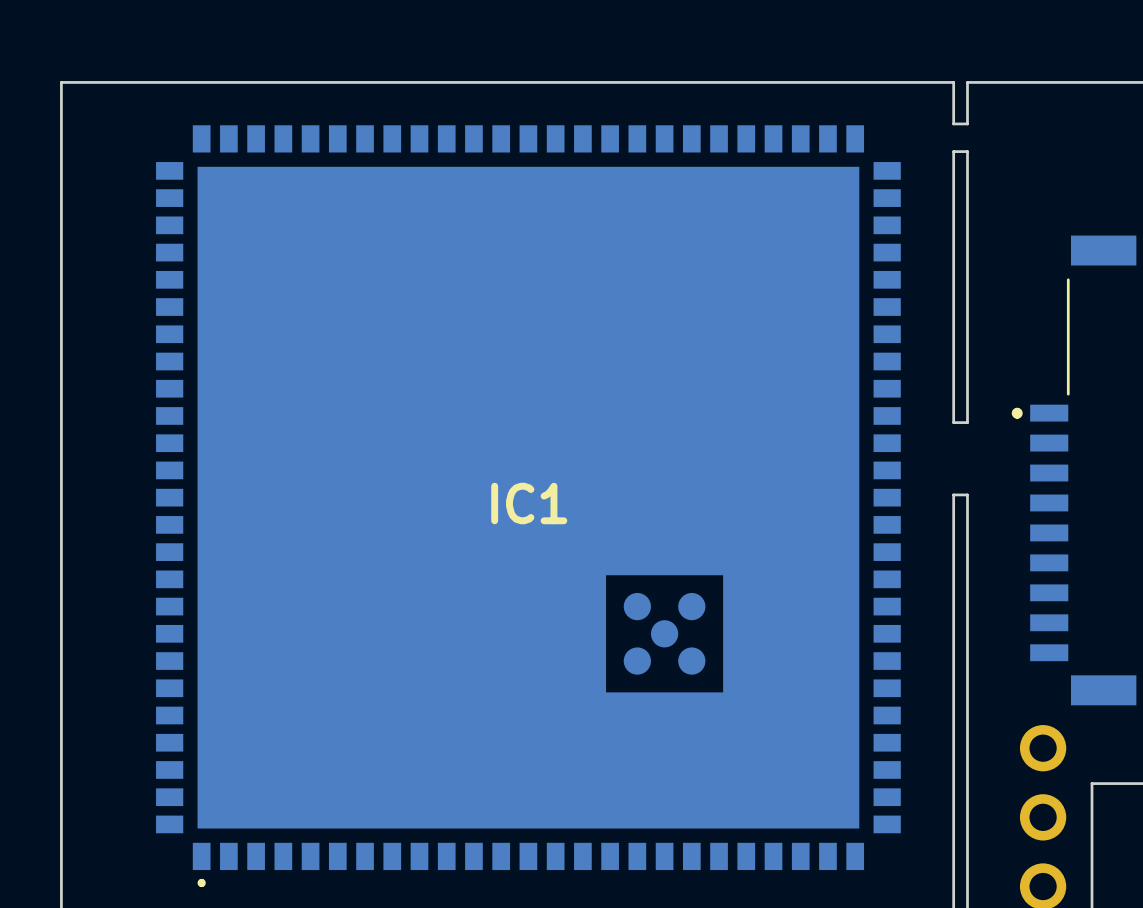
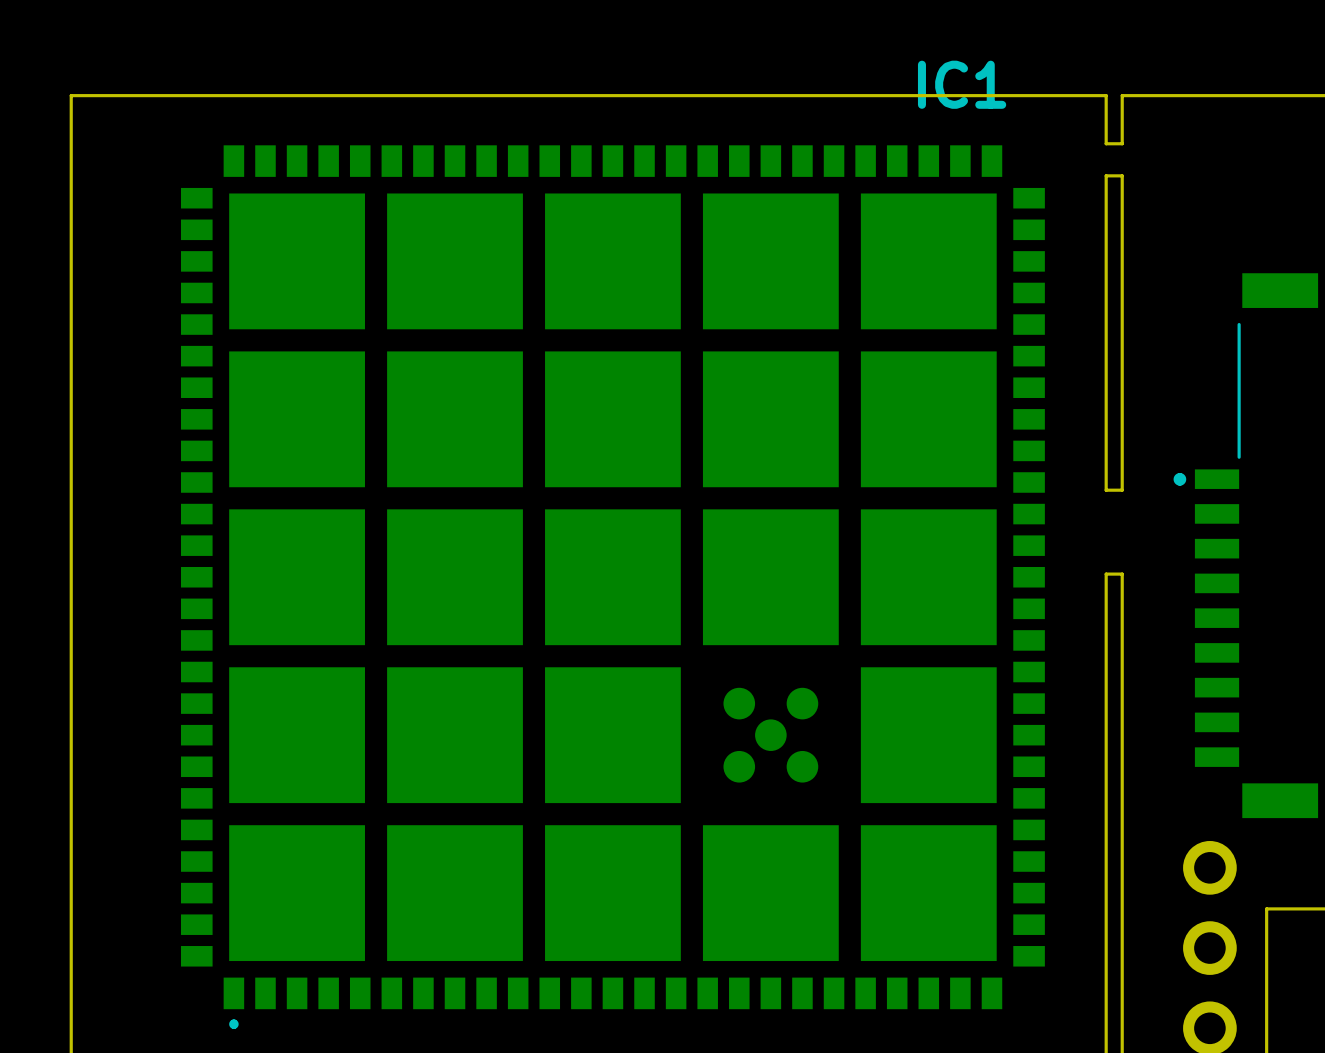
IC1 footprint: [156, 125, 901, 888] -> [180, 145, 1045, 1029]
IC1 name position: IC1 (529, 503) -> IC1 (962, 84)

